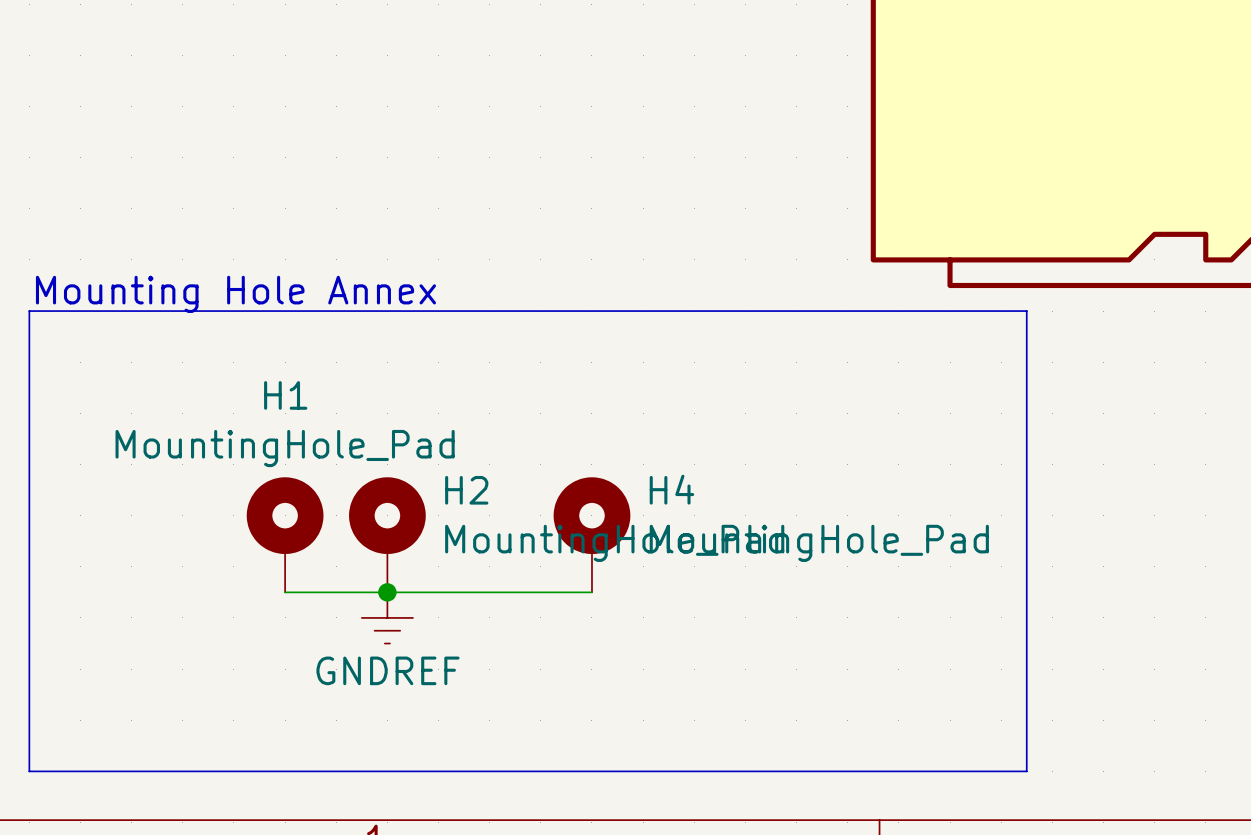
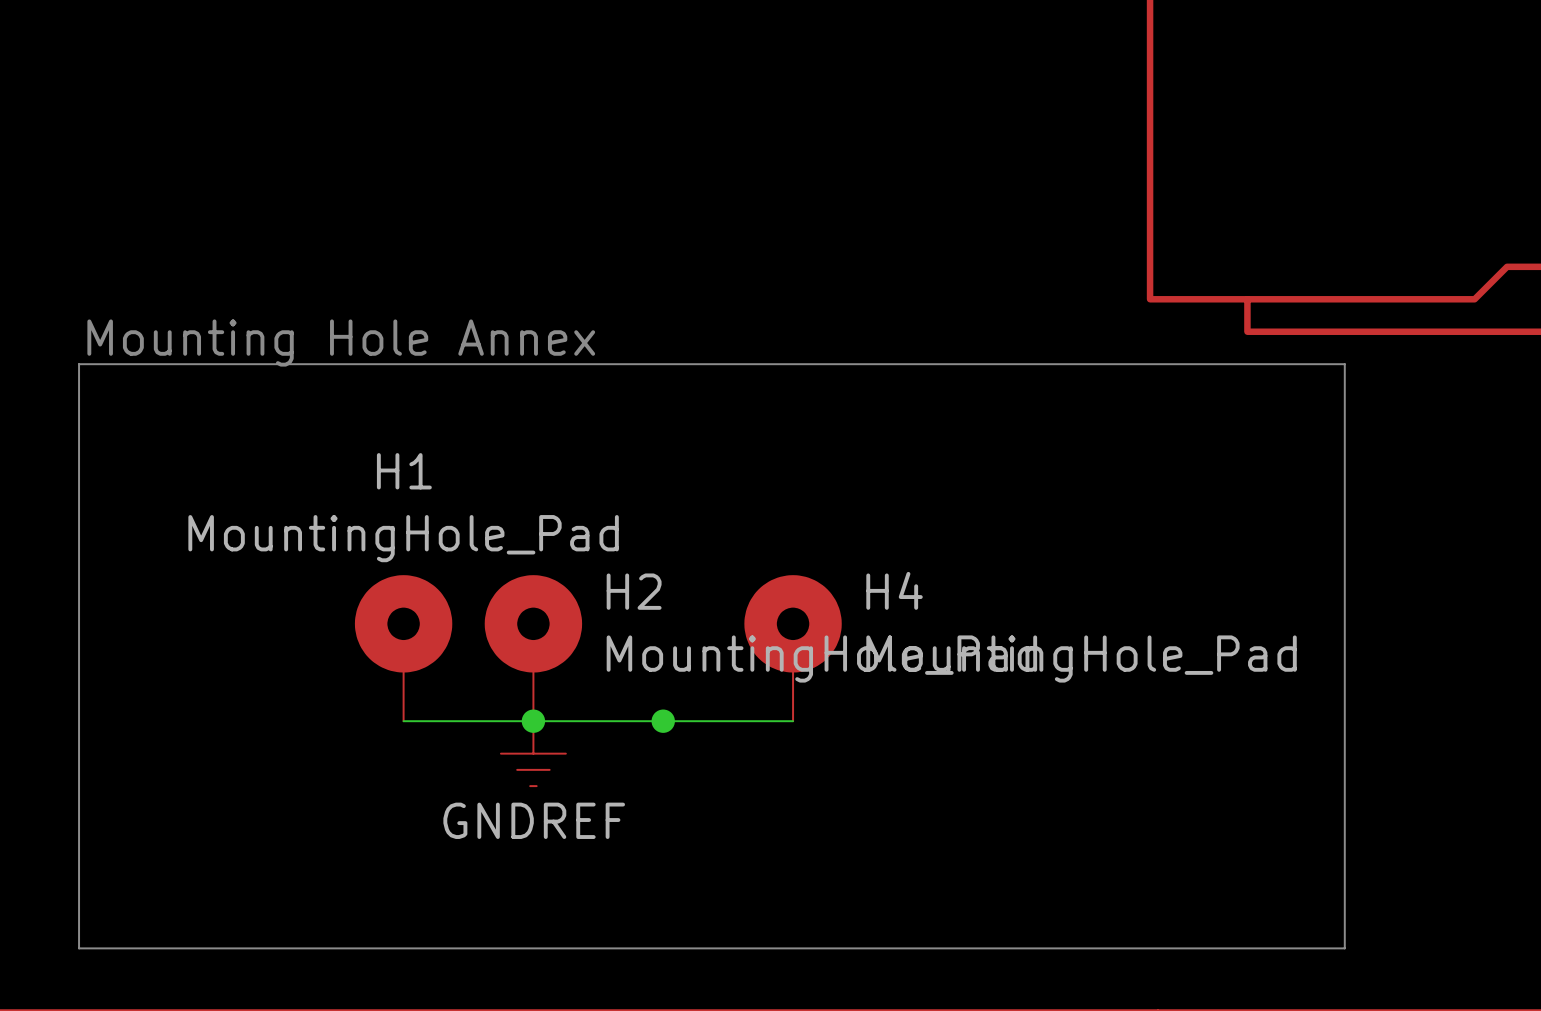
junction: none -> (663, 721)

